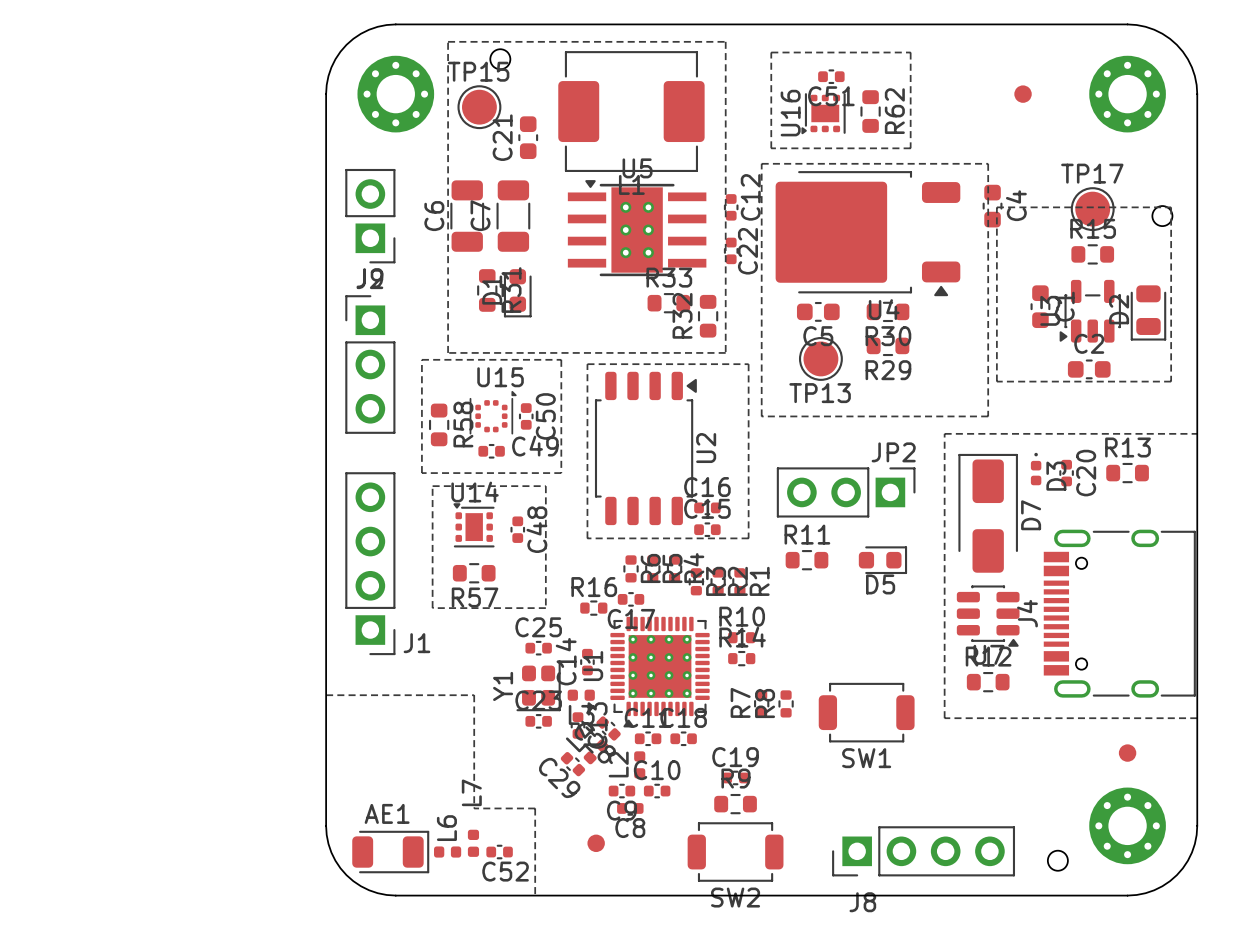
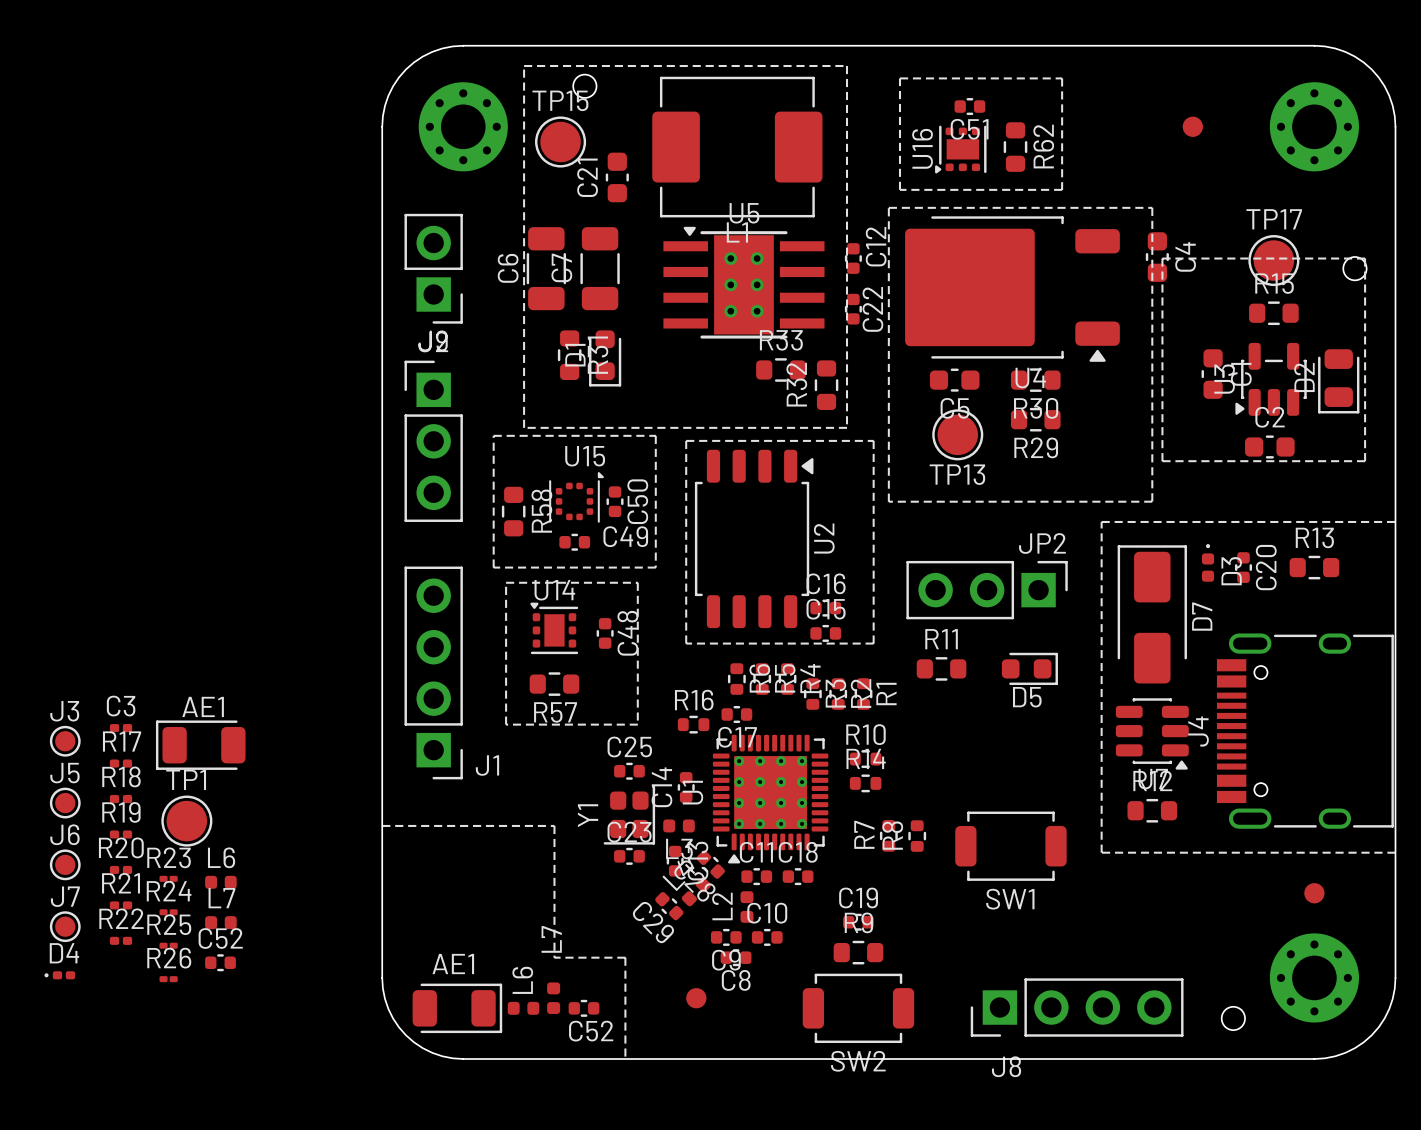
C3: none -> (121, 728)
J3: none -> (65, 741)
AE1: none -> (200, 745)
R17: none -> (121, 763)
R18: none -> (121, 799)
J5: none -> (65, 803)
TP1: none -> (186, 821)
R19: none -> (121, 834)
J6: none -> (65, 864)
R20: none -> (121, 869)
R23: none -> (168, 878)
L6: none -> (220, 882)
R21: none -> (121, 905)
R24: none -> (168, 912)
L7: none -> (220, 922)
J7: none -> (65, 926)
R22: none -> (121, 940)
R25: none -> (168, 945)
C52: none -> (220, 962)
D4: none -> (59, 975)
R26: none -> (168, 979)

